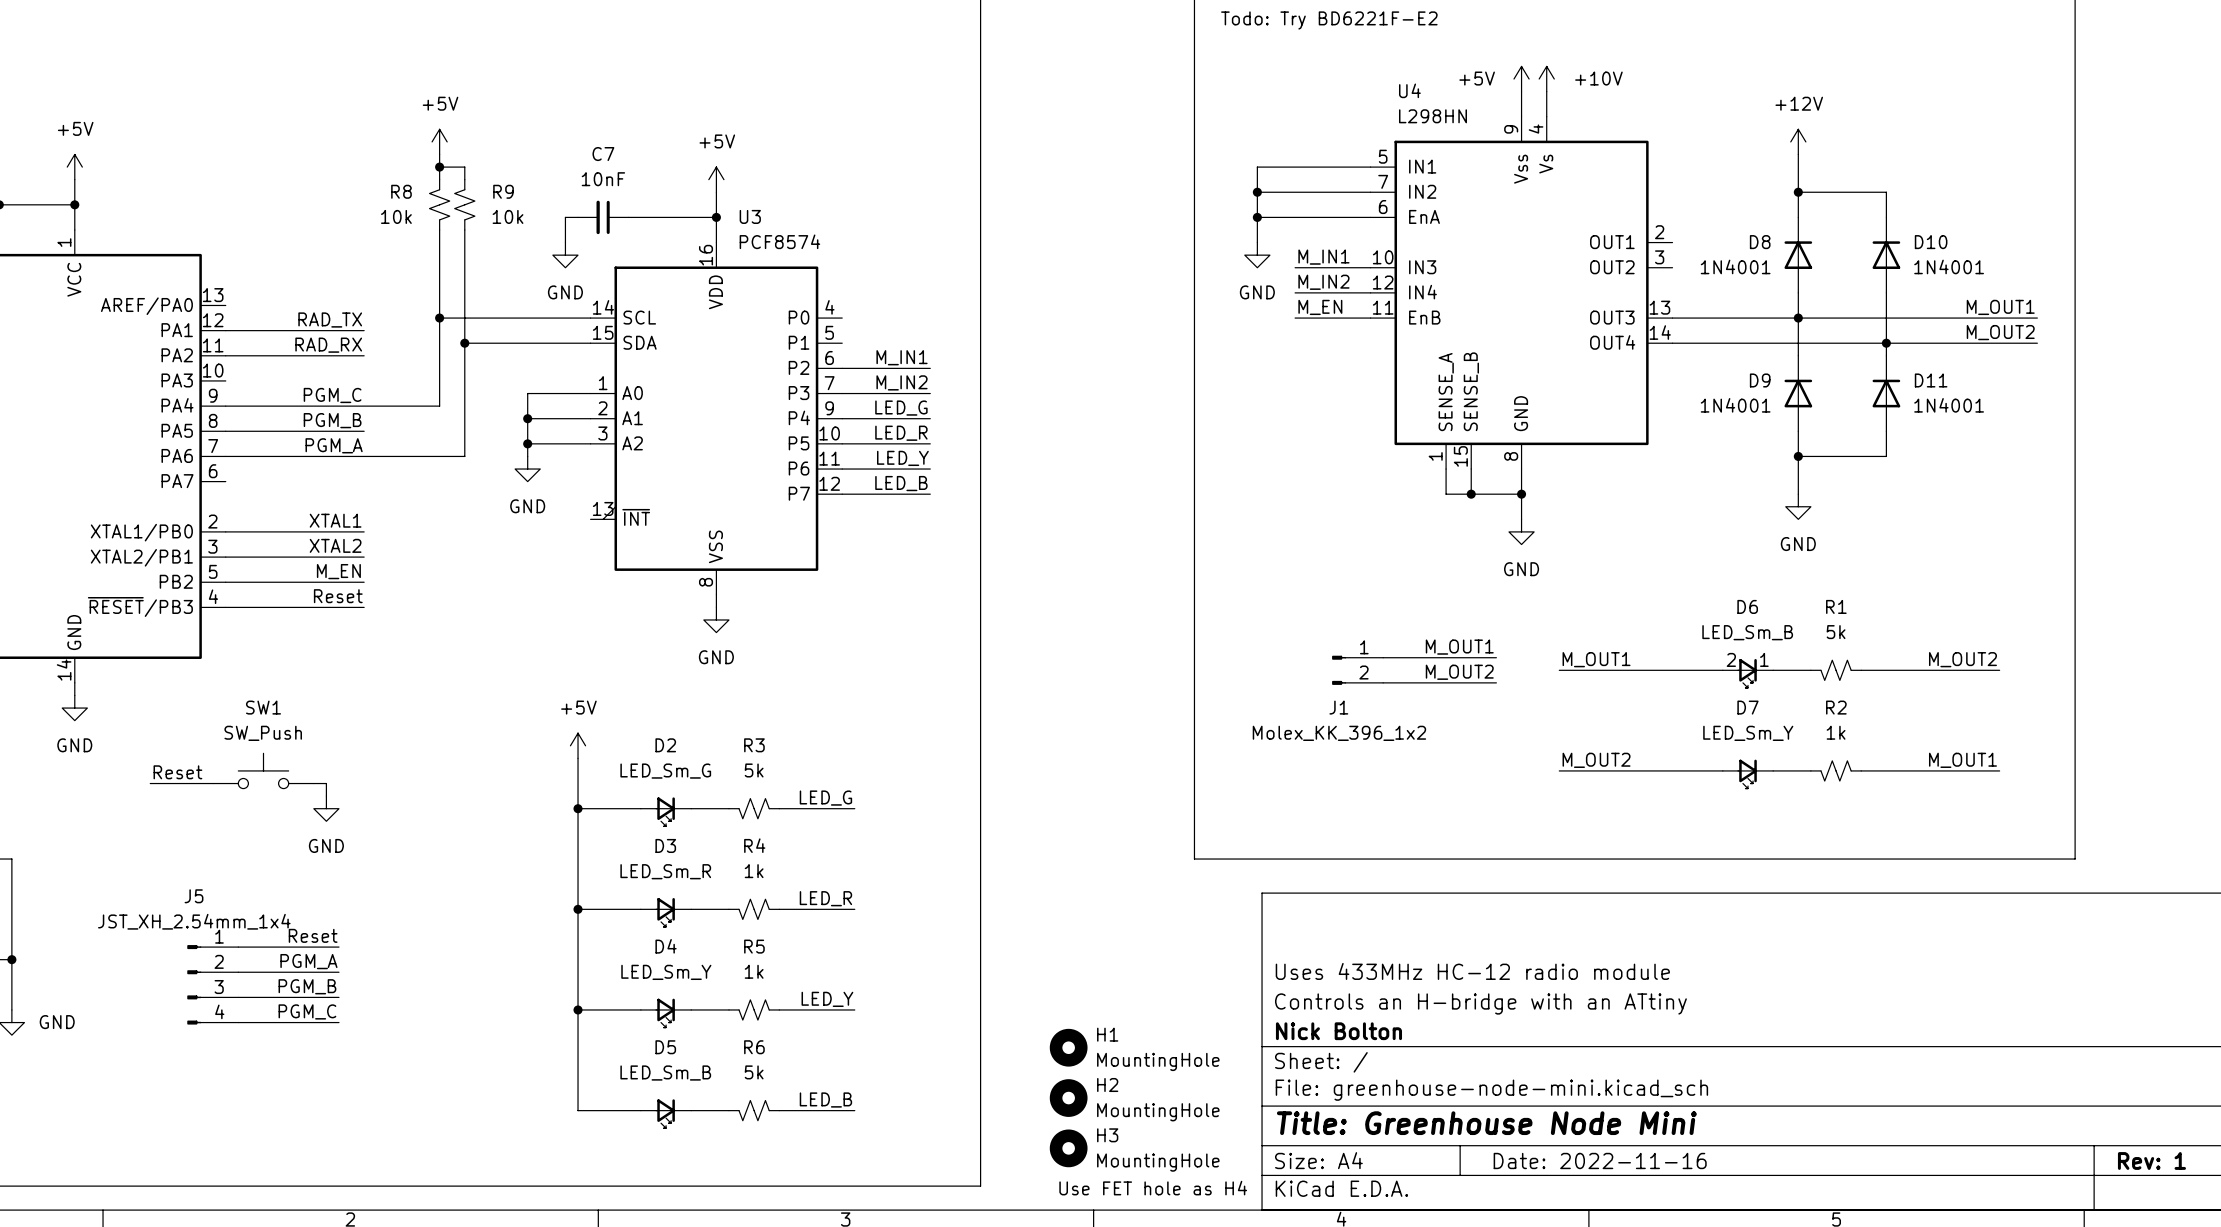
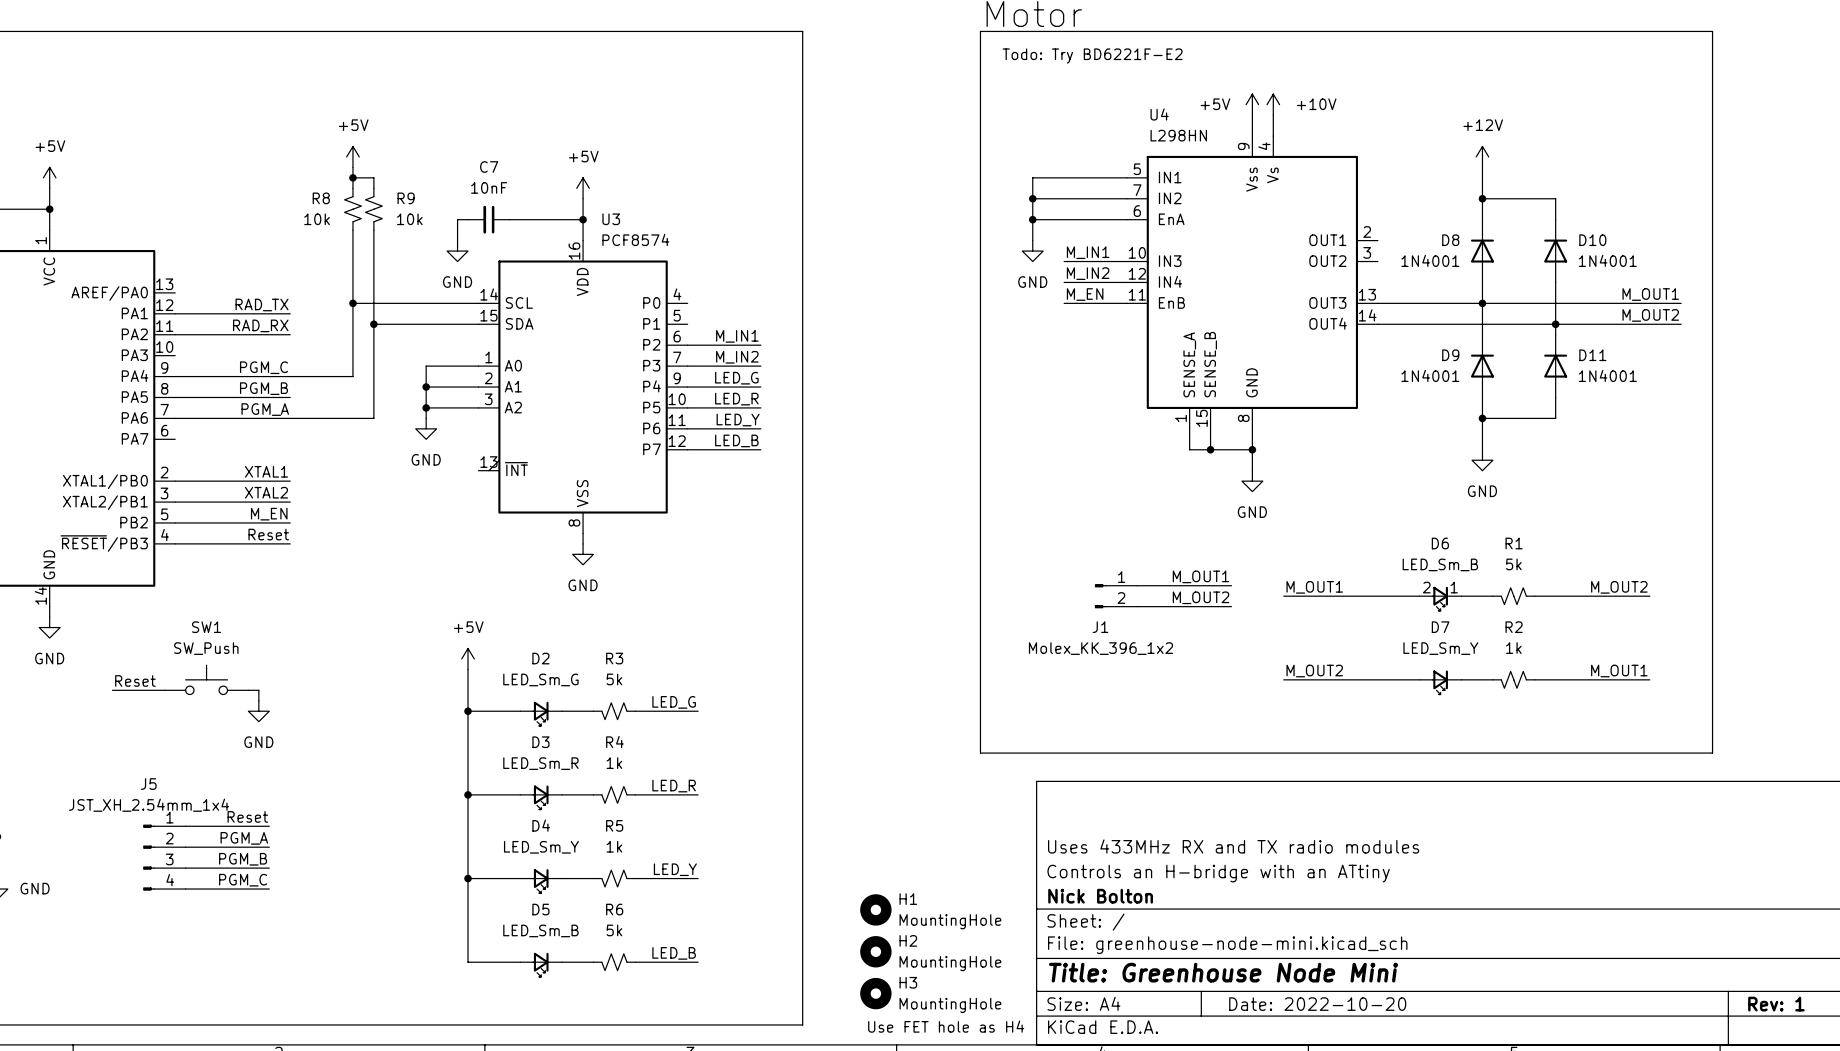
title block: Uses 433MHz HC-12 radio module (1472, 971) -> Uses 433MHz RX and TX radio modules (1233, 846)
title block: Date: 2022-11-16 (1600, 1160) -> Date: 2022-10-20 (1317, 1004)

